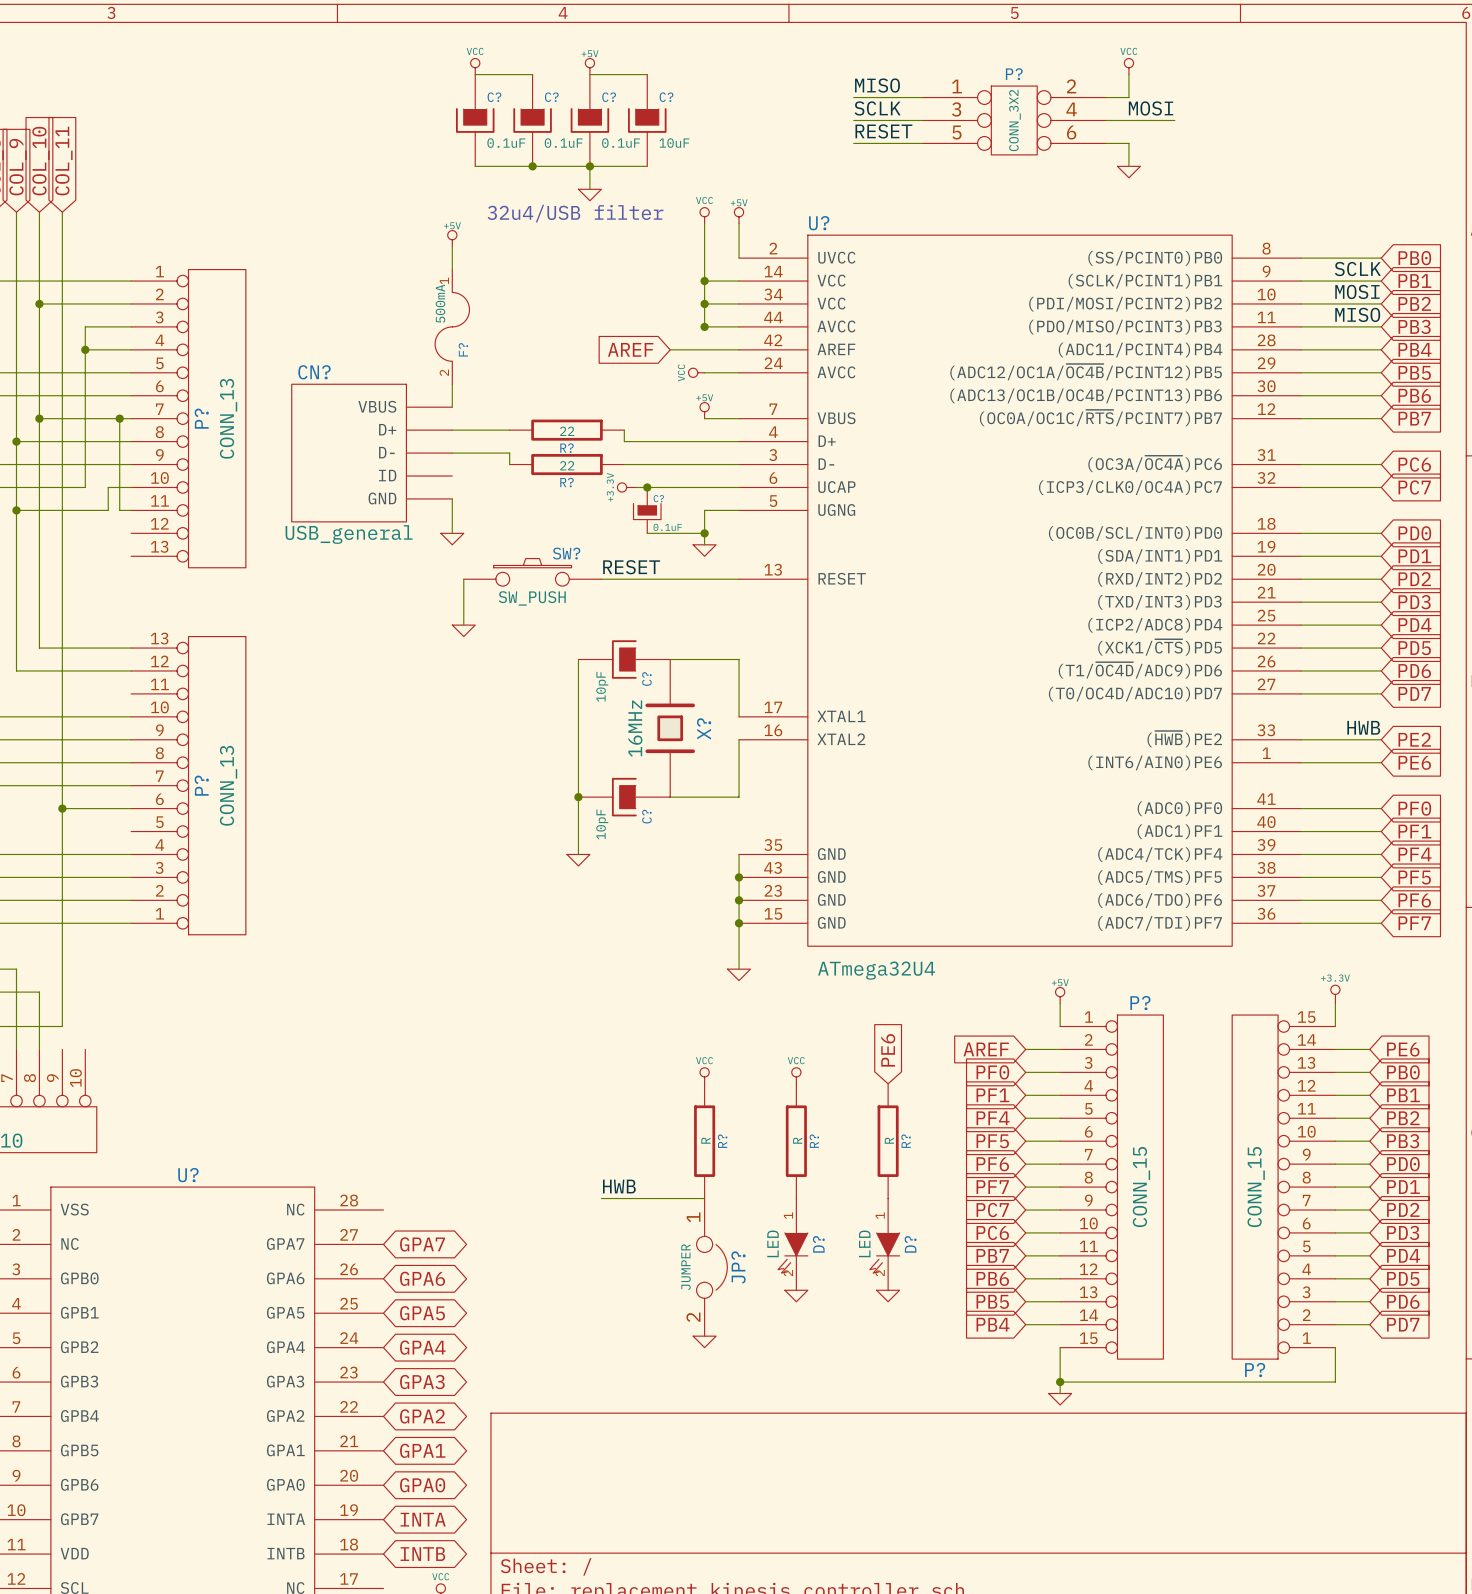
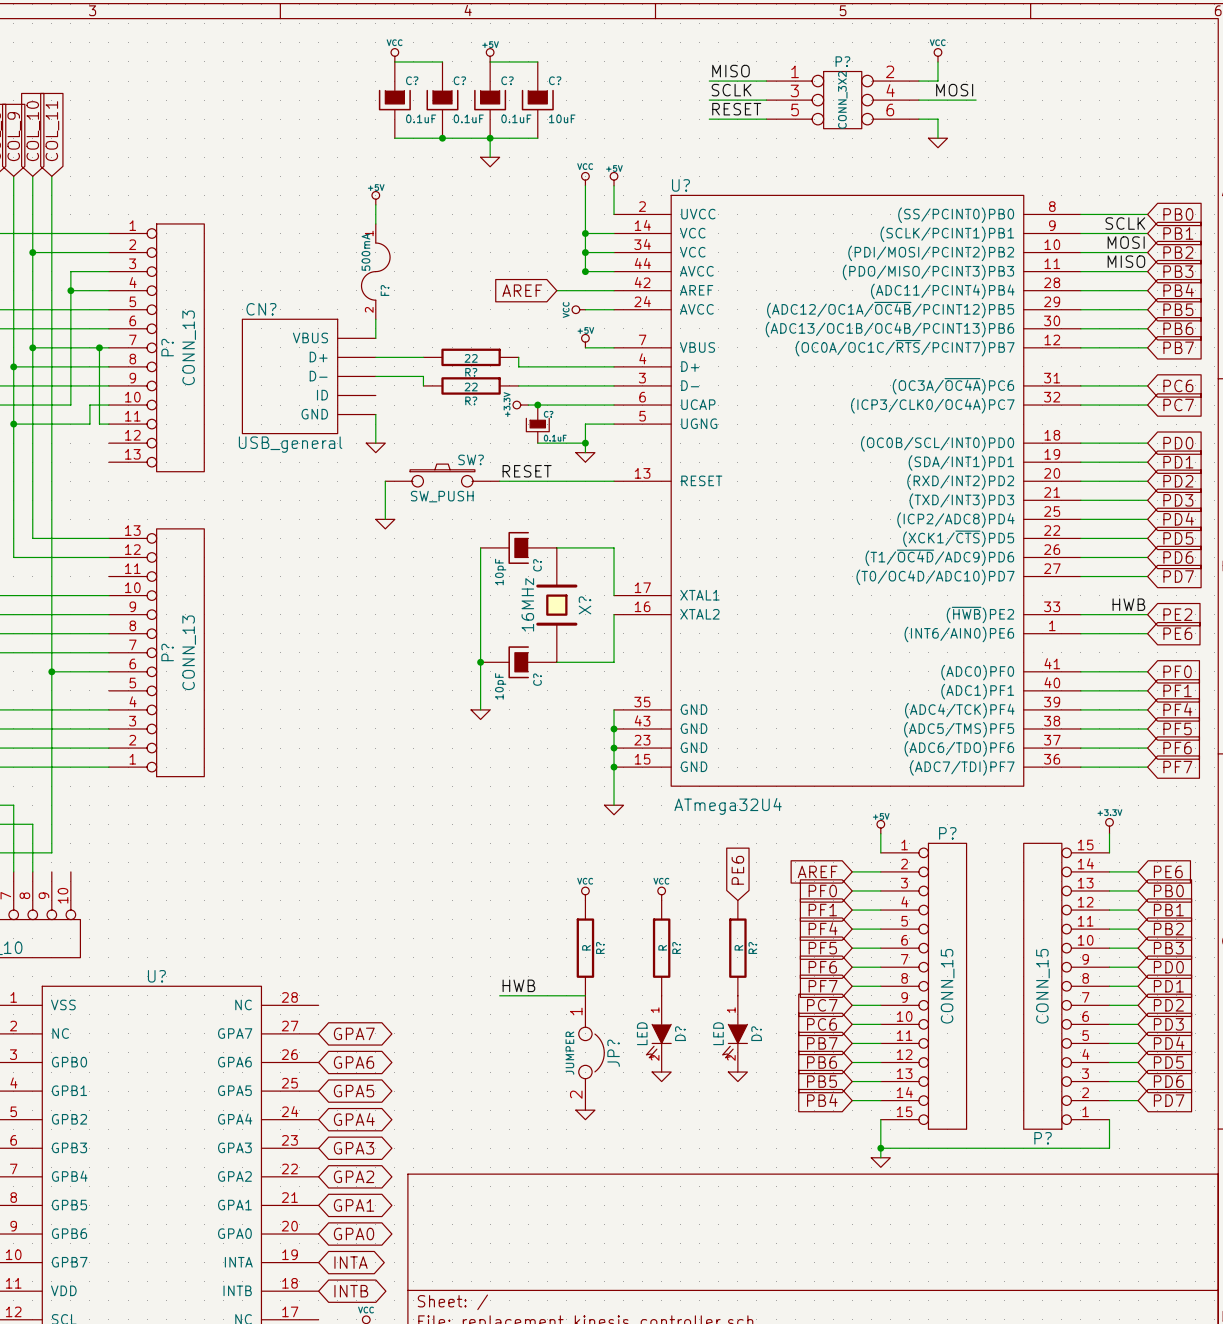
text: 32u4/USB filter (575, 213) -> none

